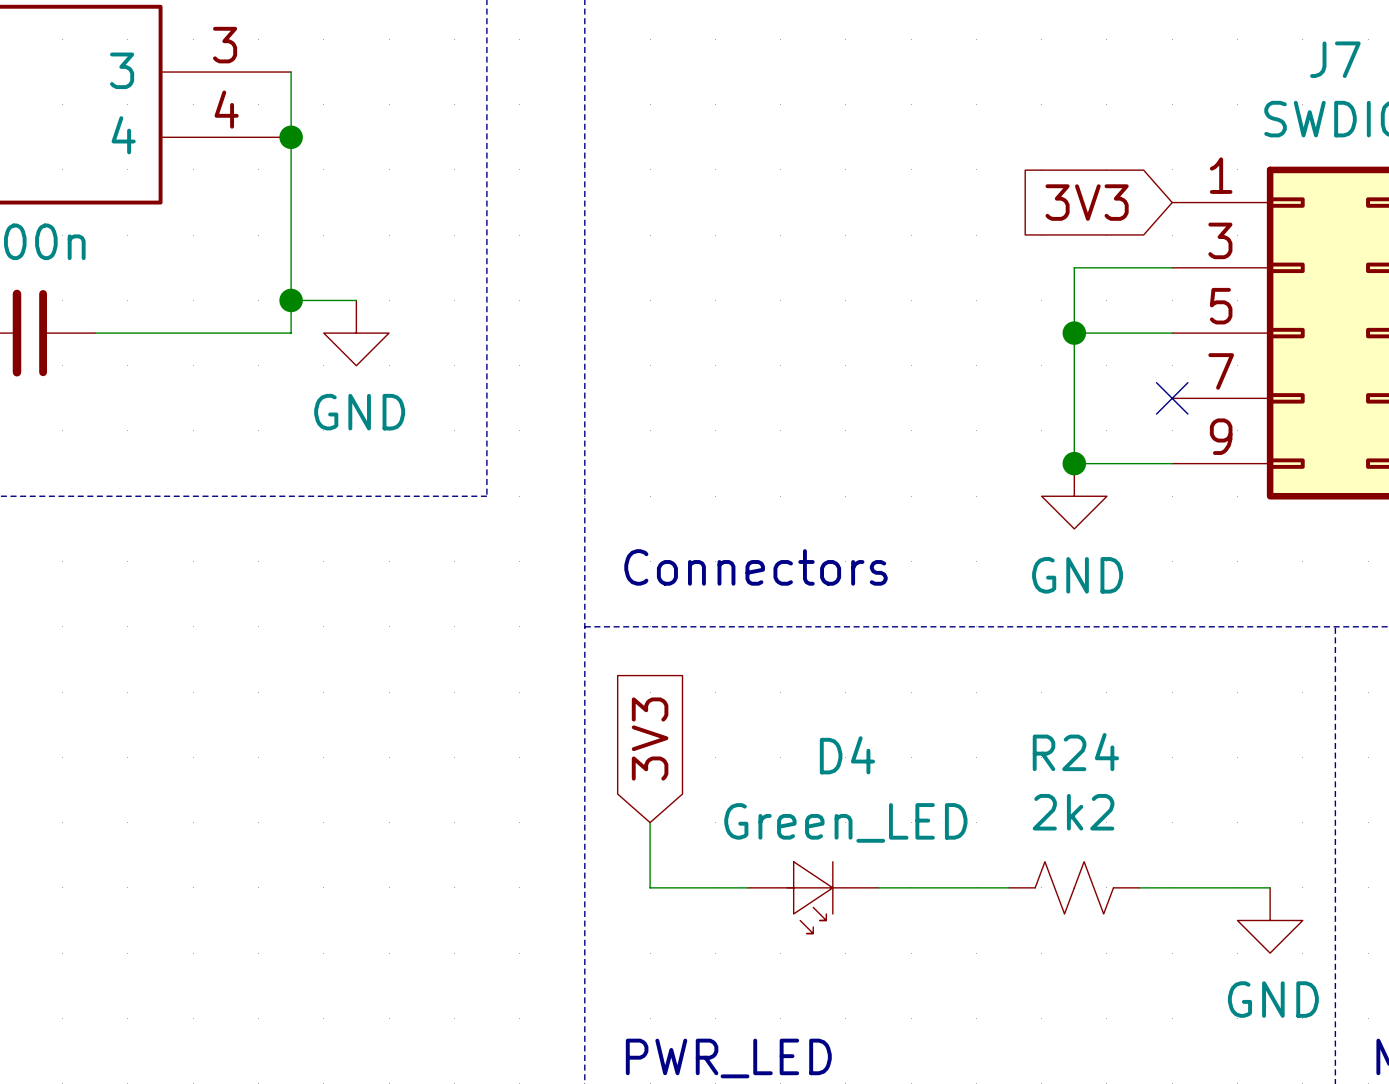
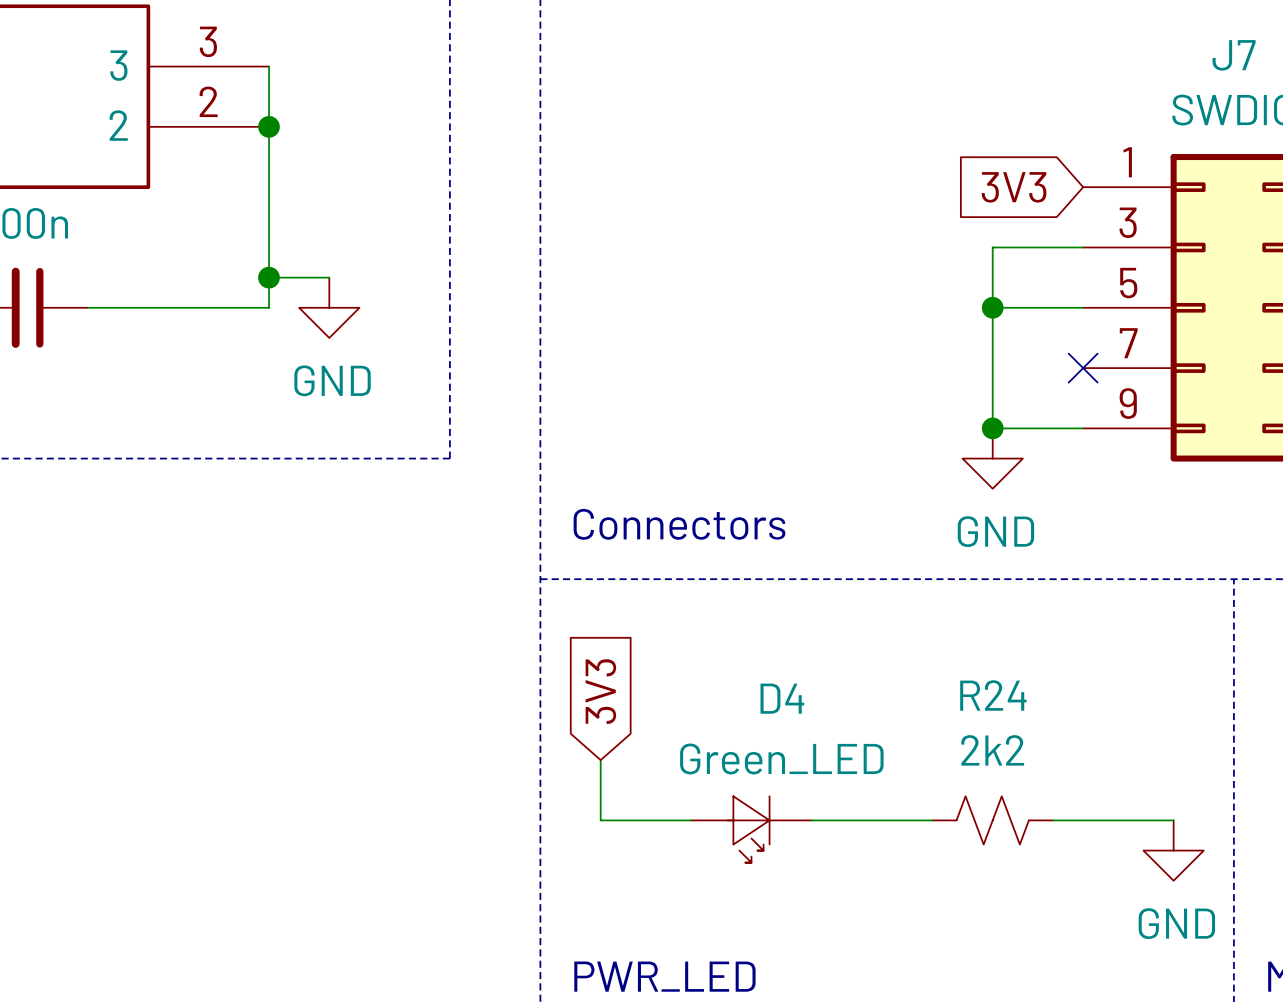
part pin number: 4 (226, 109) -> 2 (208, 101)
part pin name: 4 (123, 135) -> 2 (118, 125)

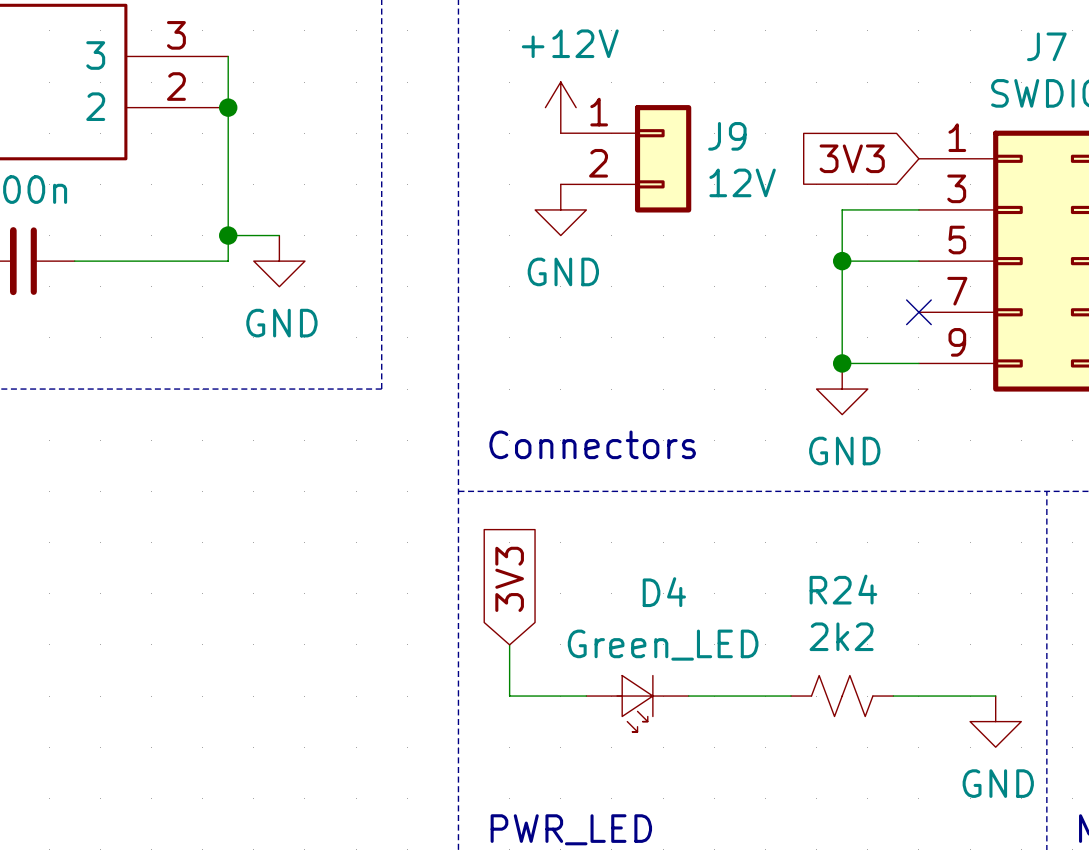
power symbol: none -> +12V (560, 107)
J9: none -> 12V (626, 158)
power symbol: none -> GND (560, 209)

